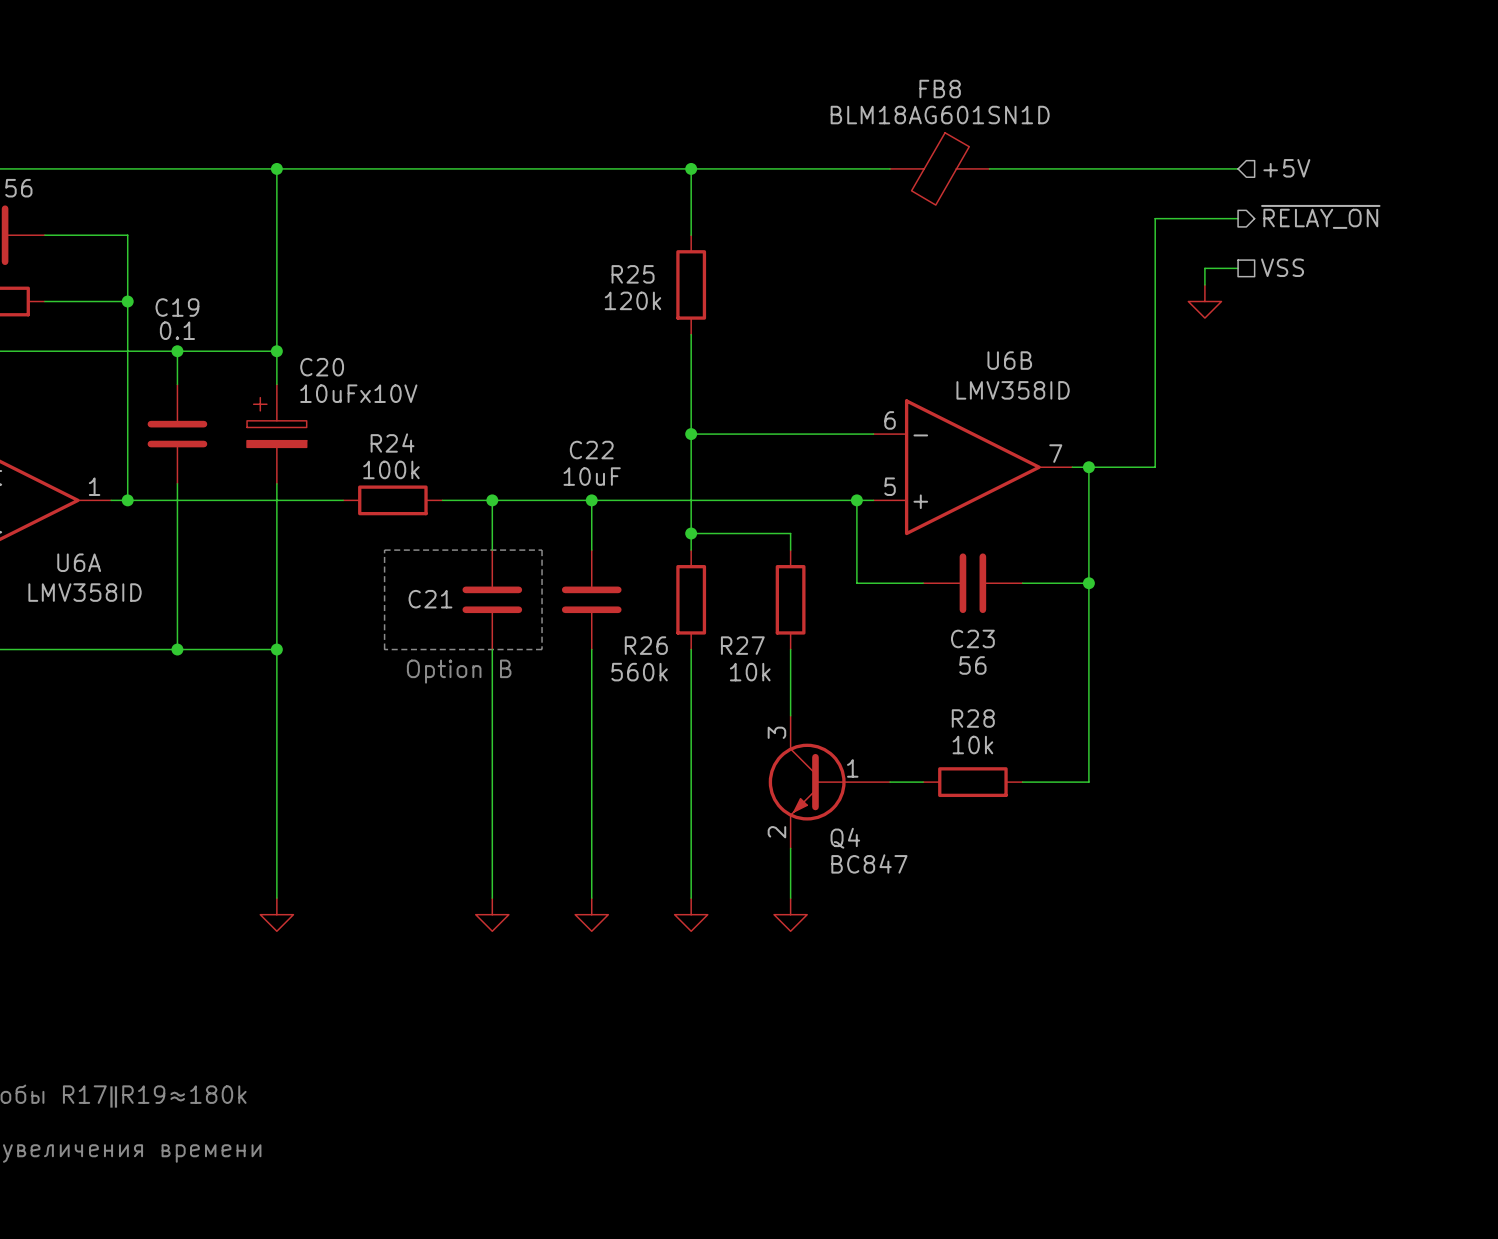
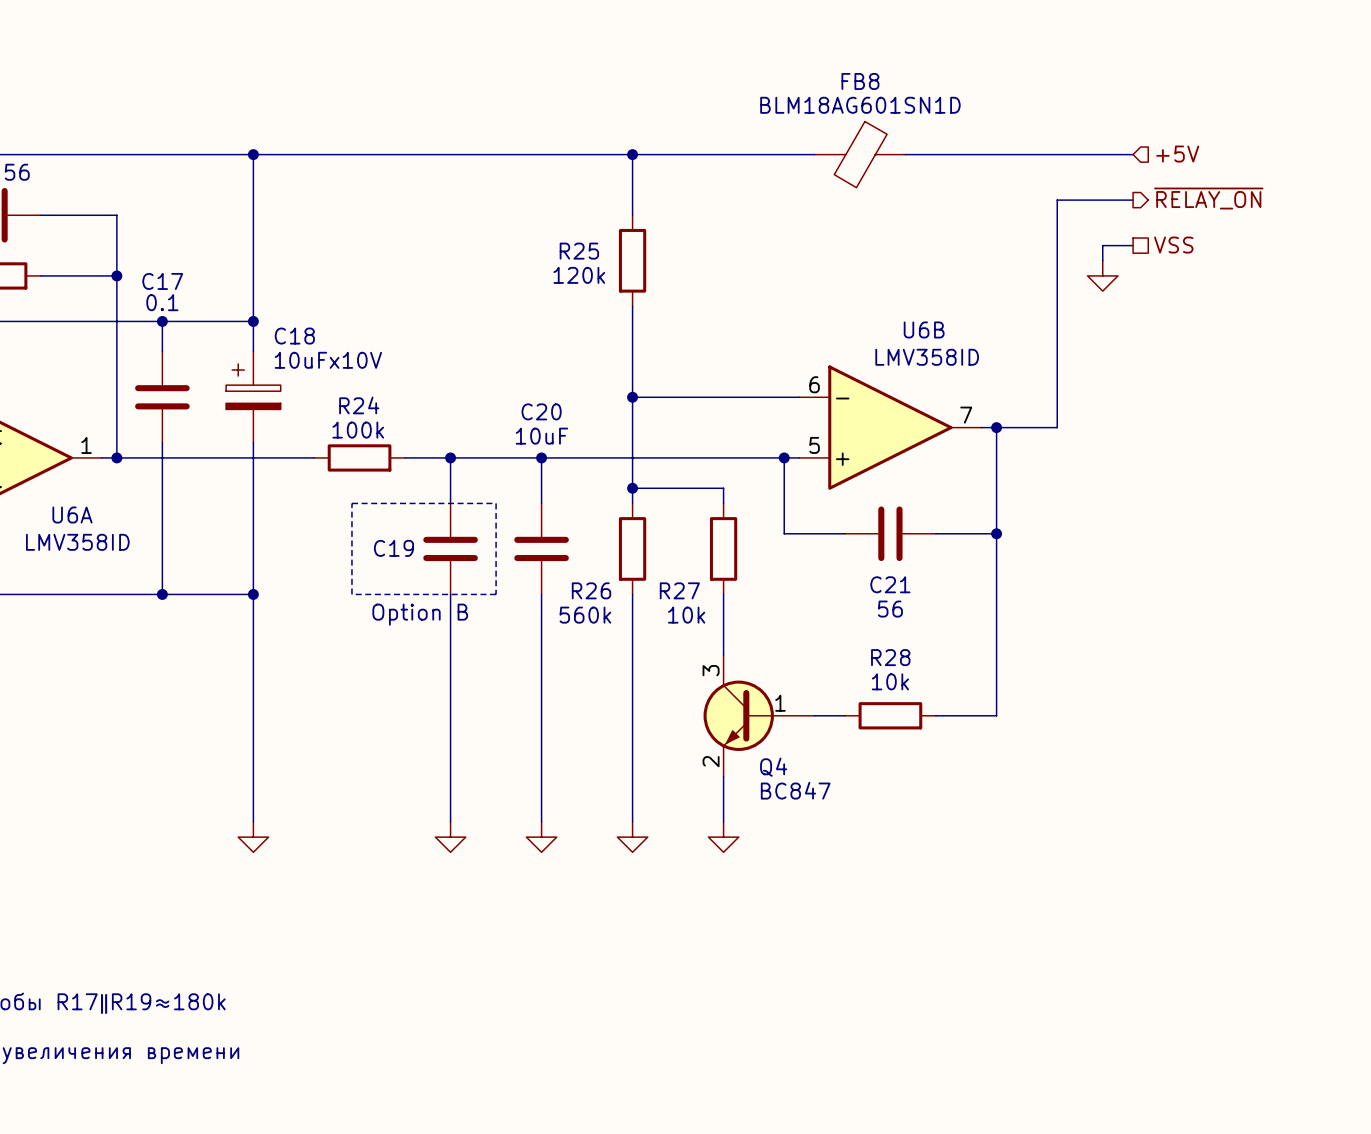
C19 name: C19 (177, 307) -> C17 (162, 281)
C20 name: C20 (322, 367) -> C18 (294, 336)
C22 name: C22 (591, 450) -> C20 (541, 411)
C21 name: C21 (430, 599) -> C19 (393, 548)
C23 name: C23 (972, 638) -> C21 (890, 584)

